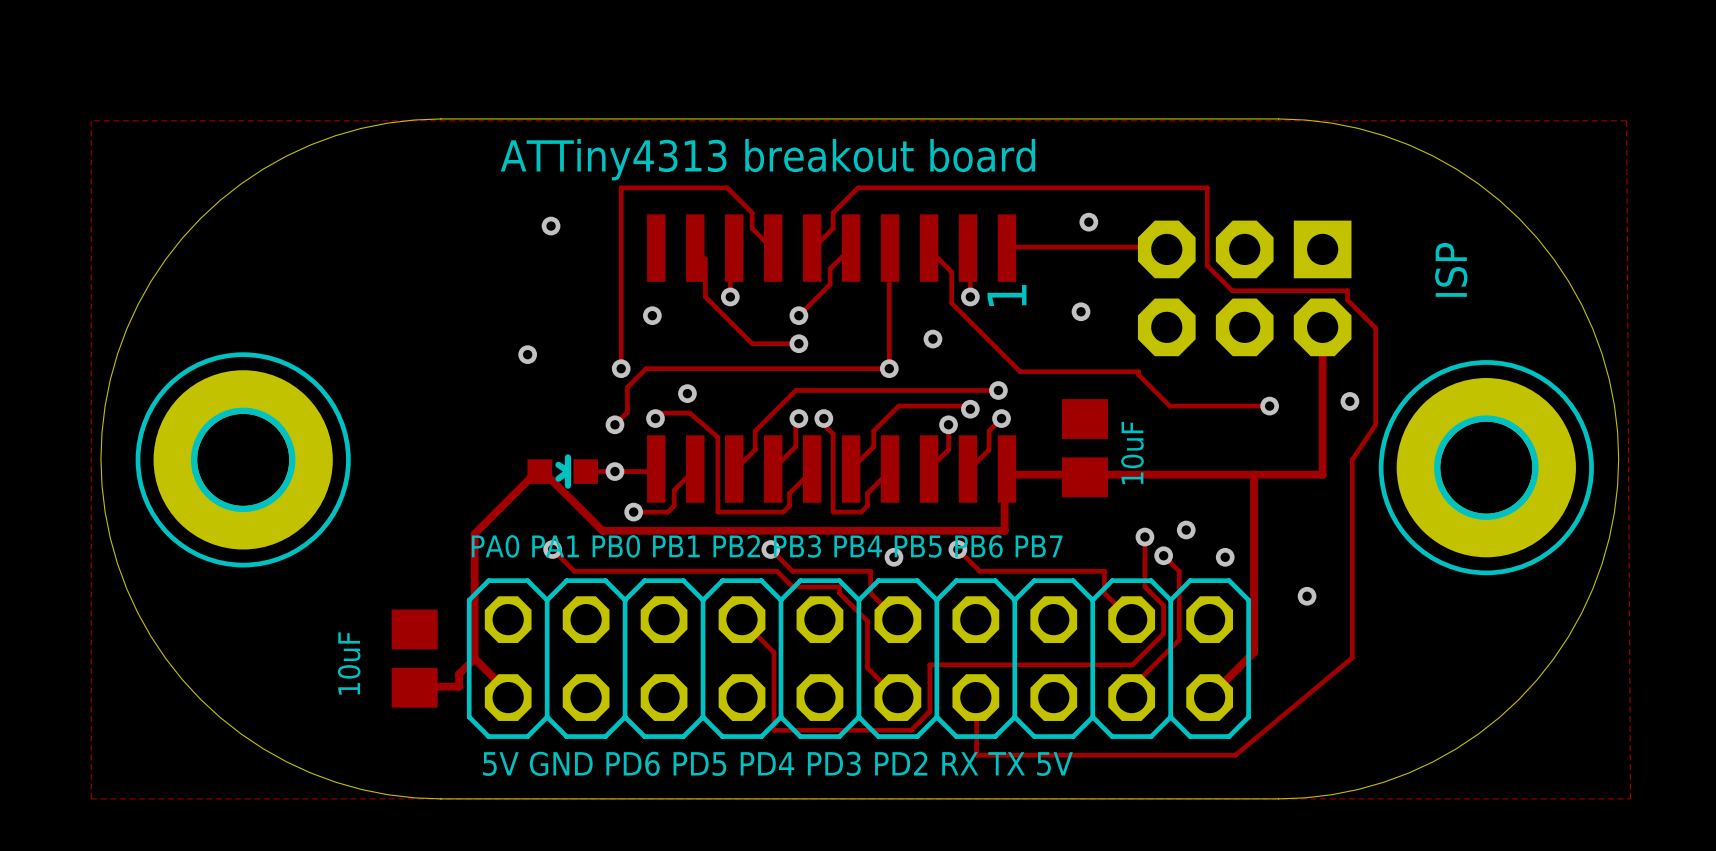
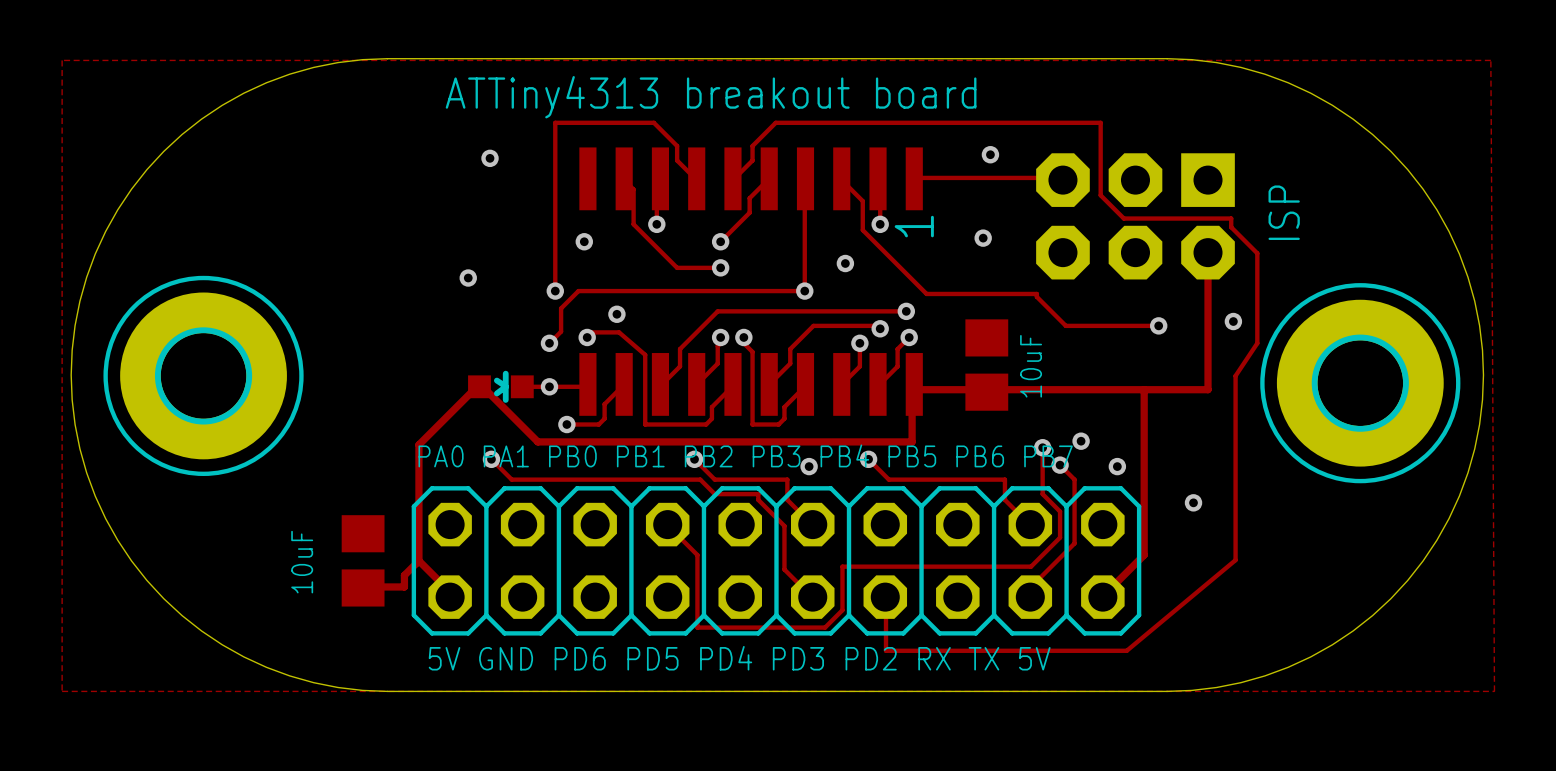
text position: ISP (1451, 269) -> ISP (1284, 212)

